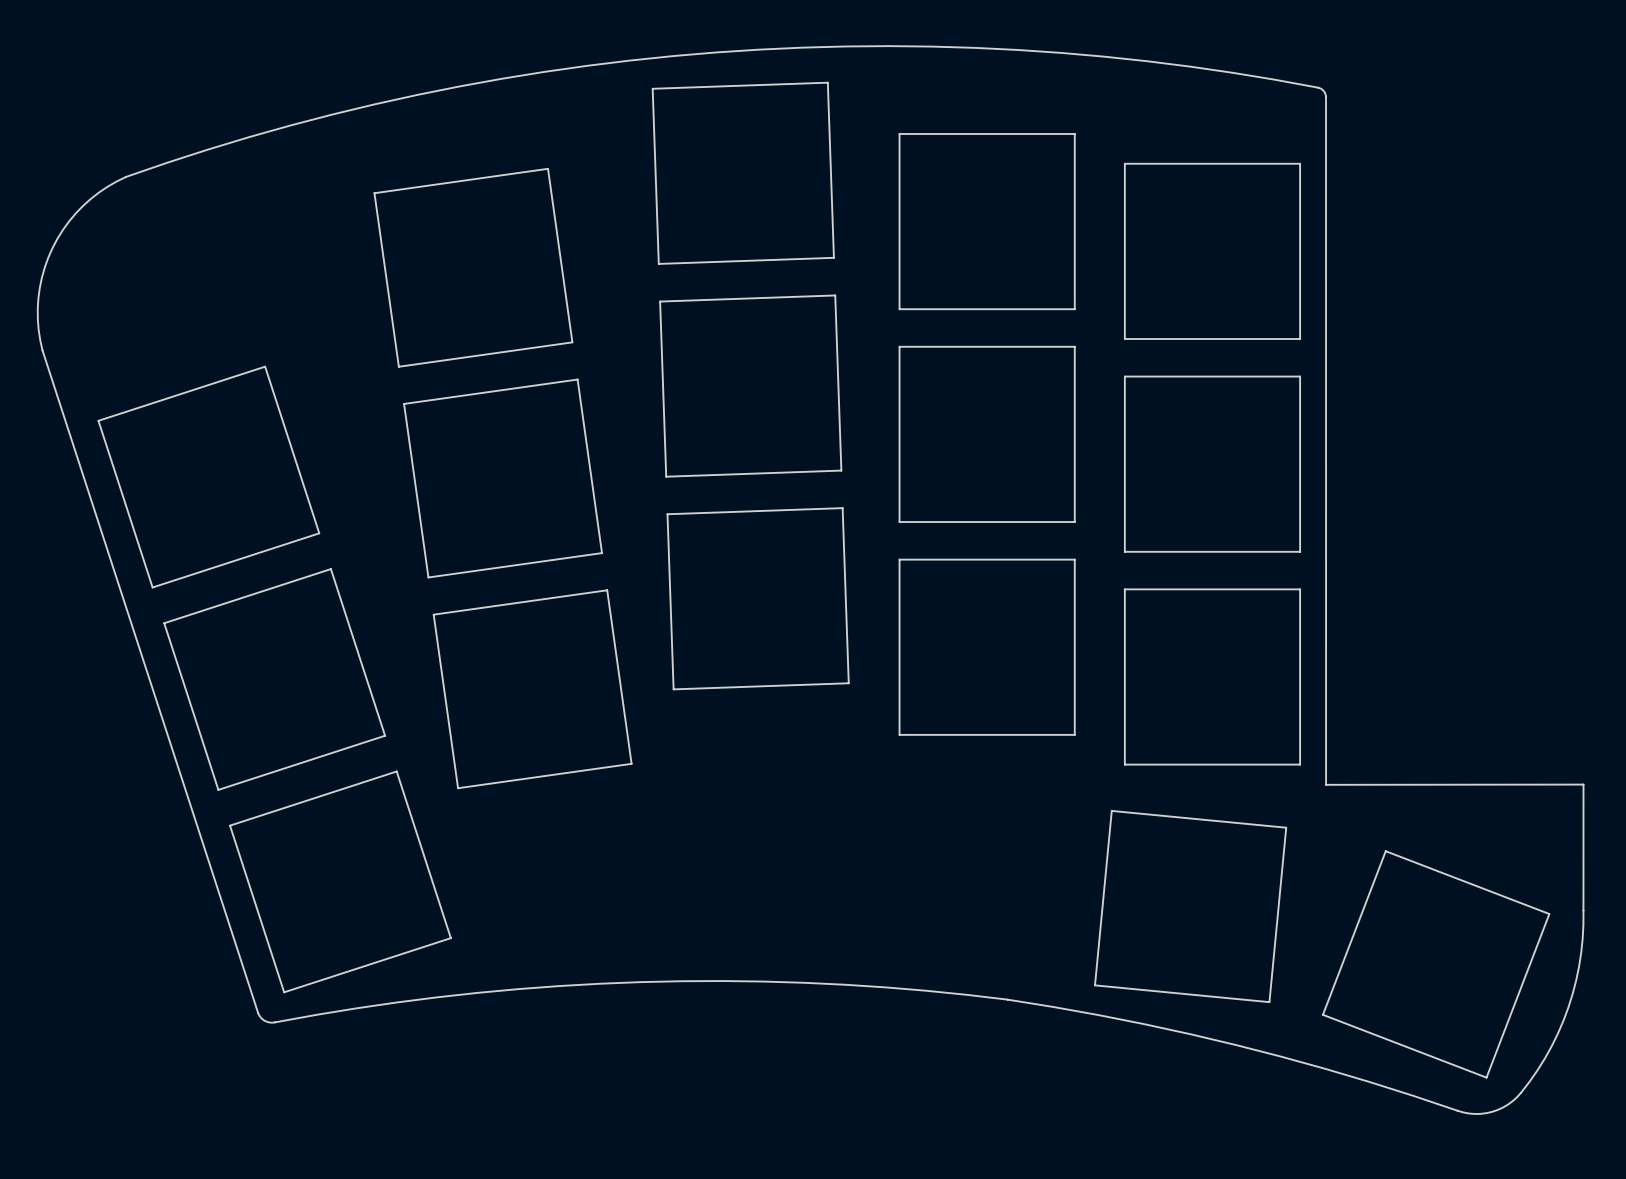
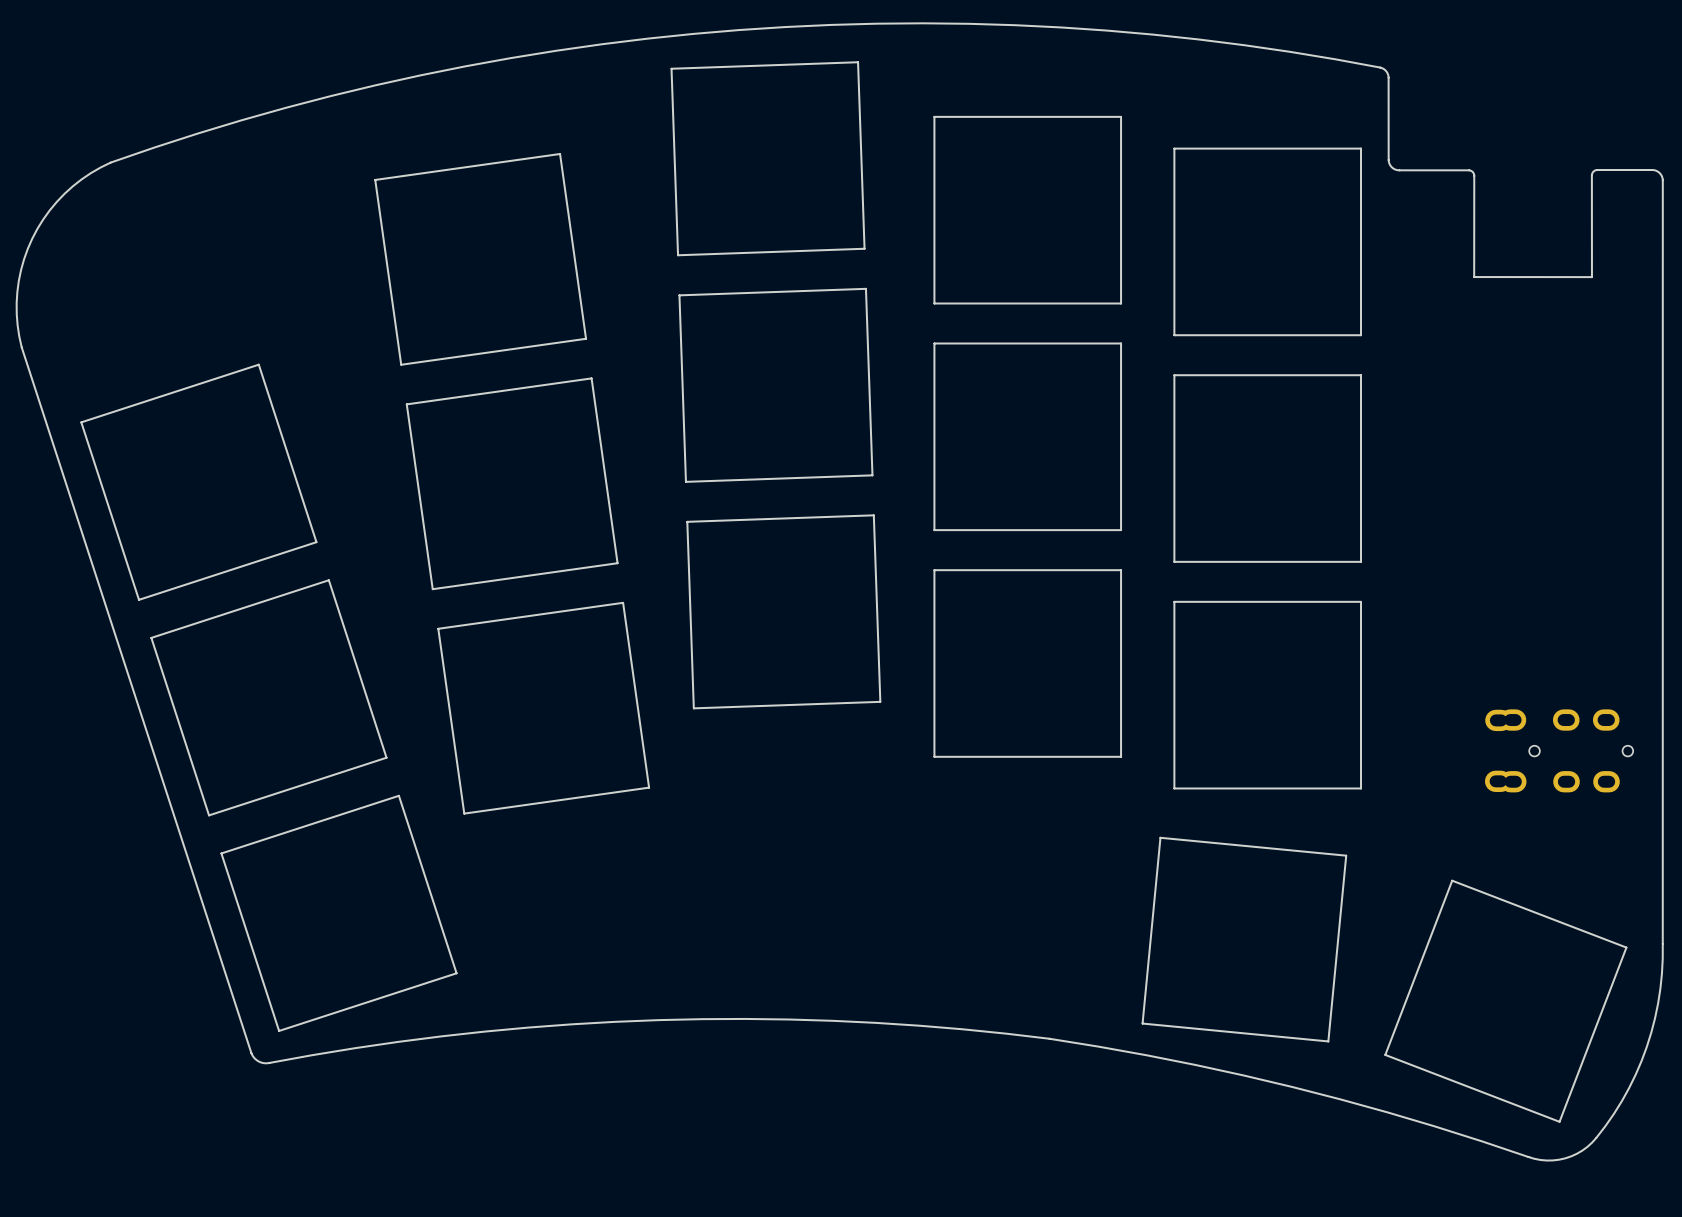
board edge: (1326, 97) (1326, 784) (1583, 784) (1583, 910) -> (1469, 170) (1474, 175) (1474, 277) (1591, 277) (1592, 172) (1597, 169) (1652, 170) (1659, 172) (1662, 177) (1662, 943)
board edge: none -> (1388, 77) (1388, 161) (1391, 167) (1399, 170)
board edge: none -> (1399, 170) (1469, 170)
part: none -> (1559, 750)

